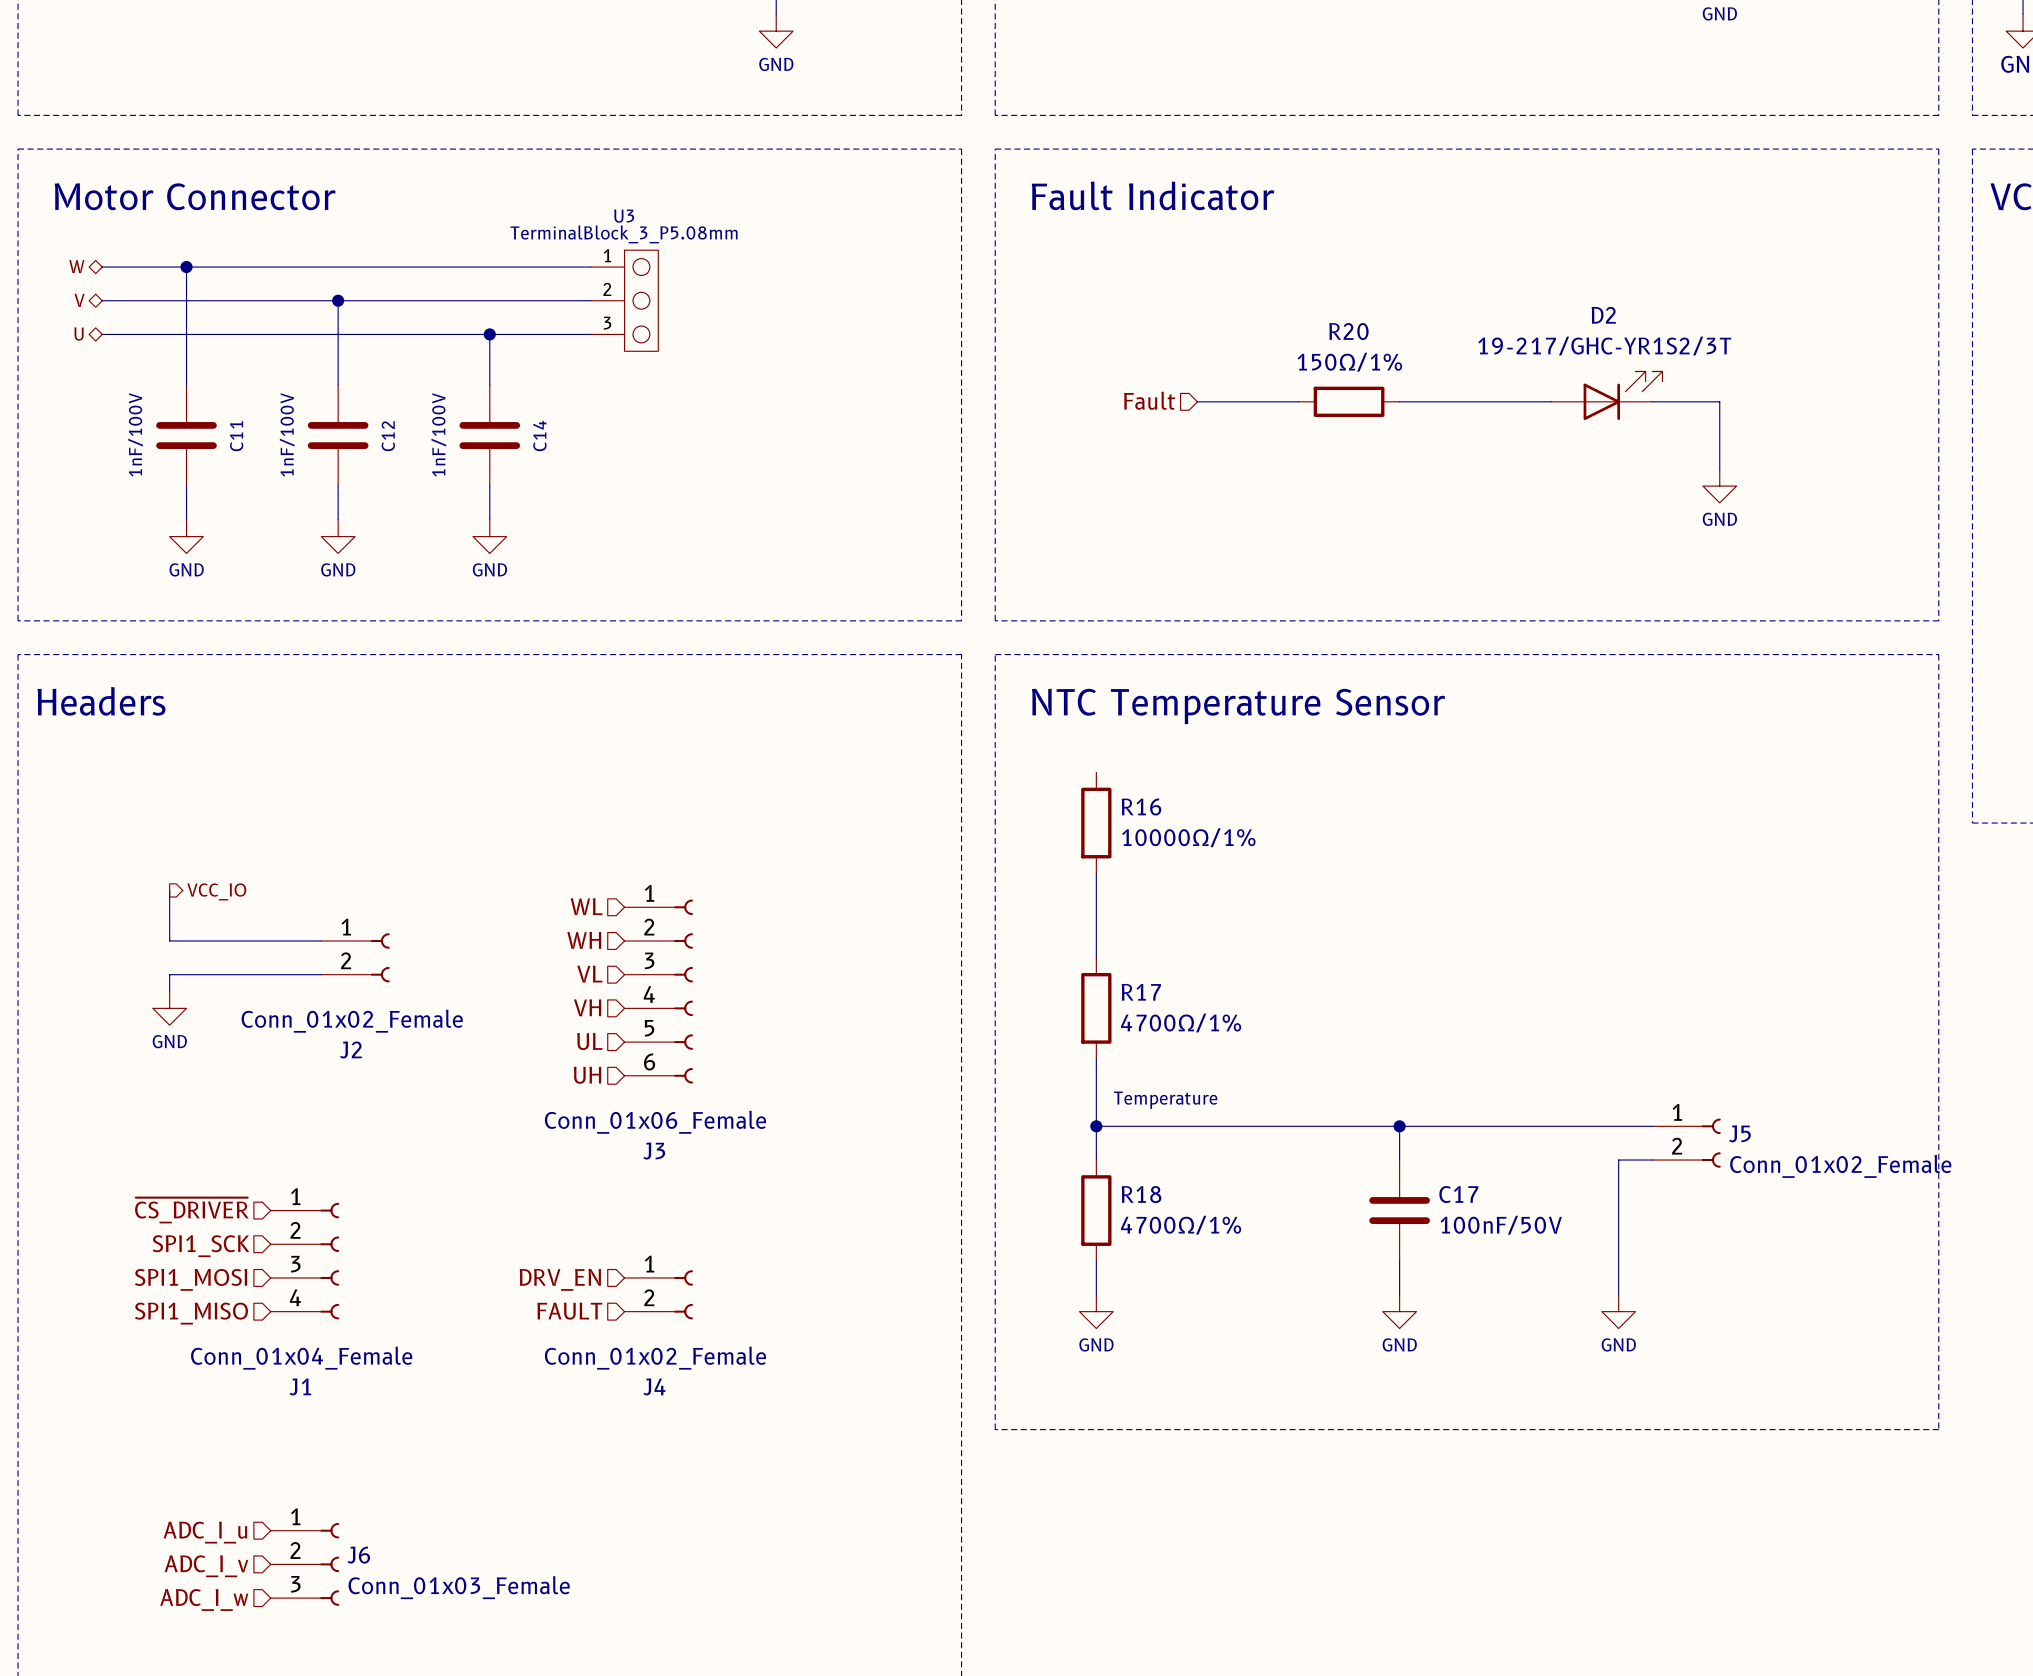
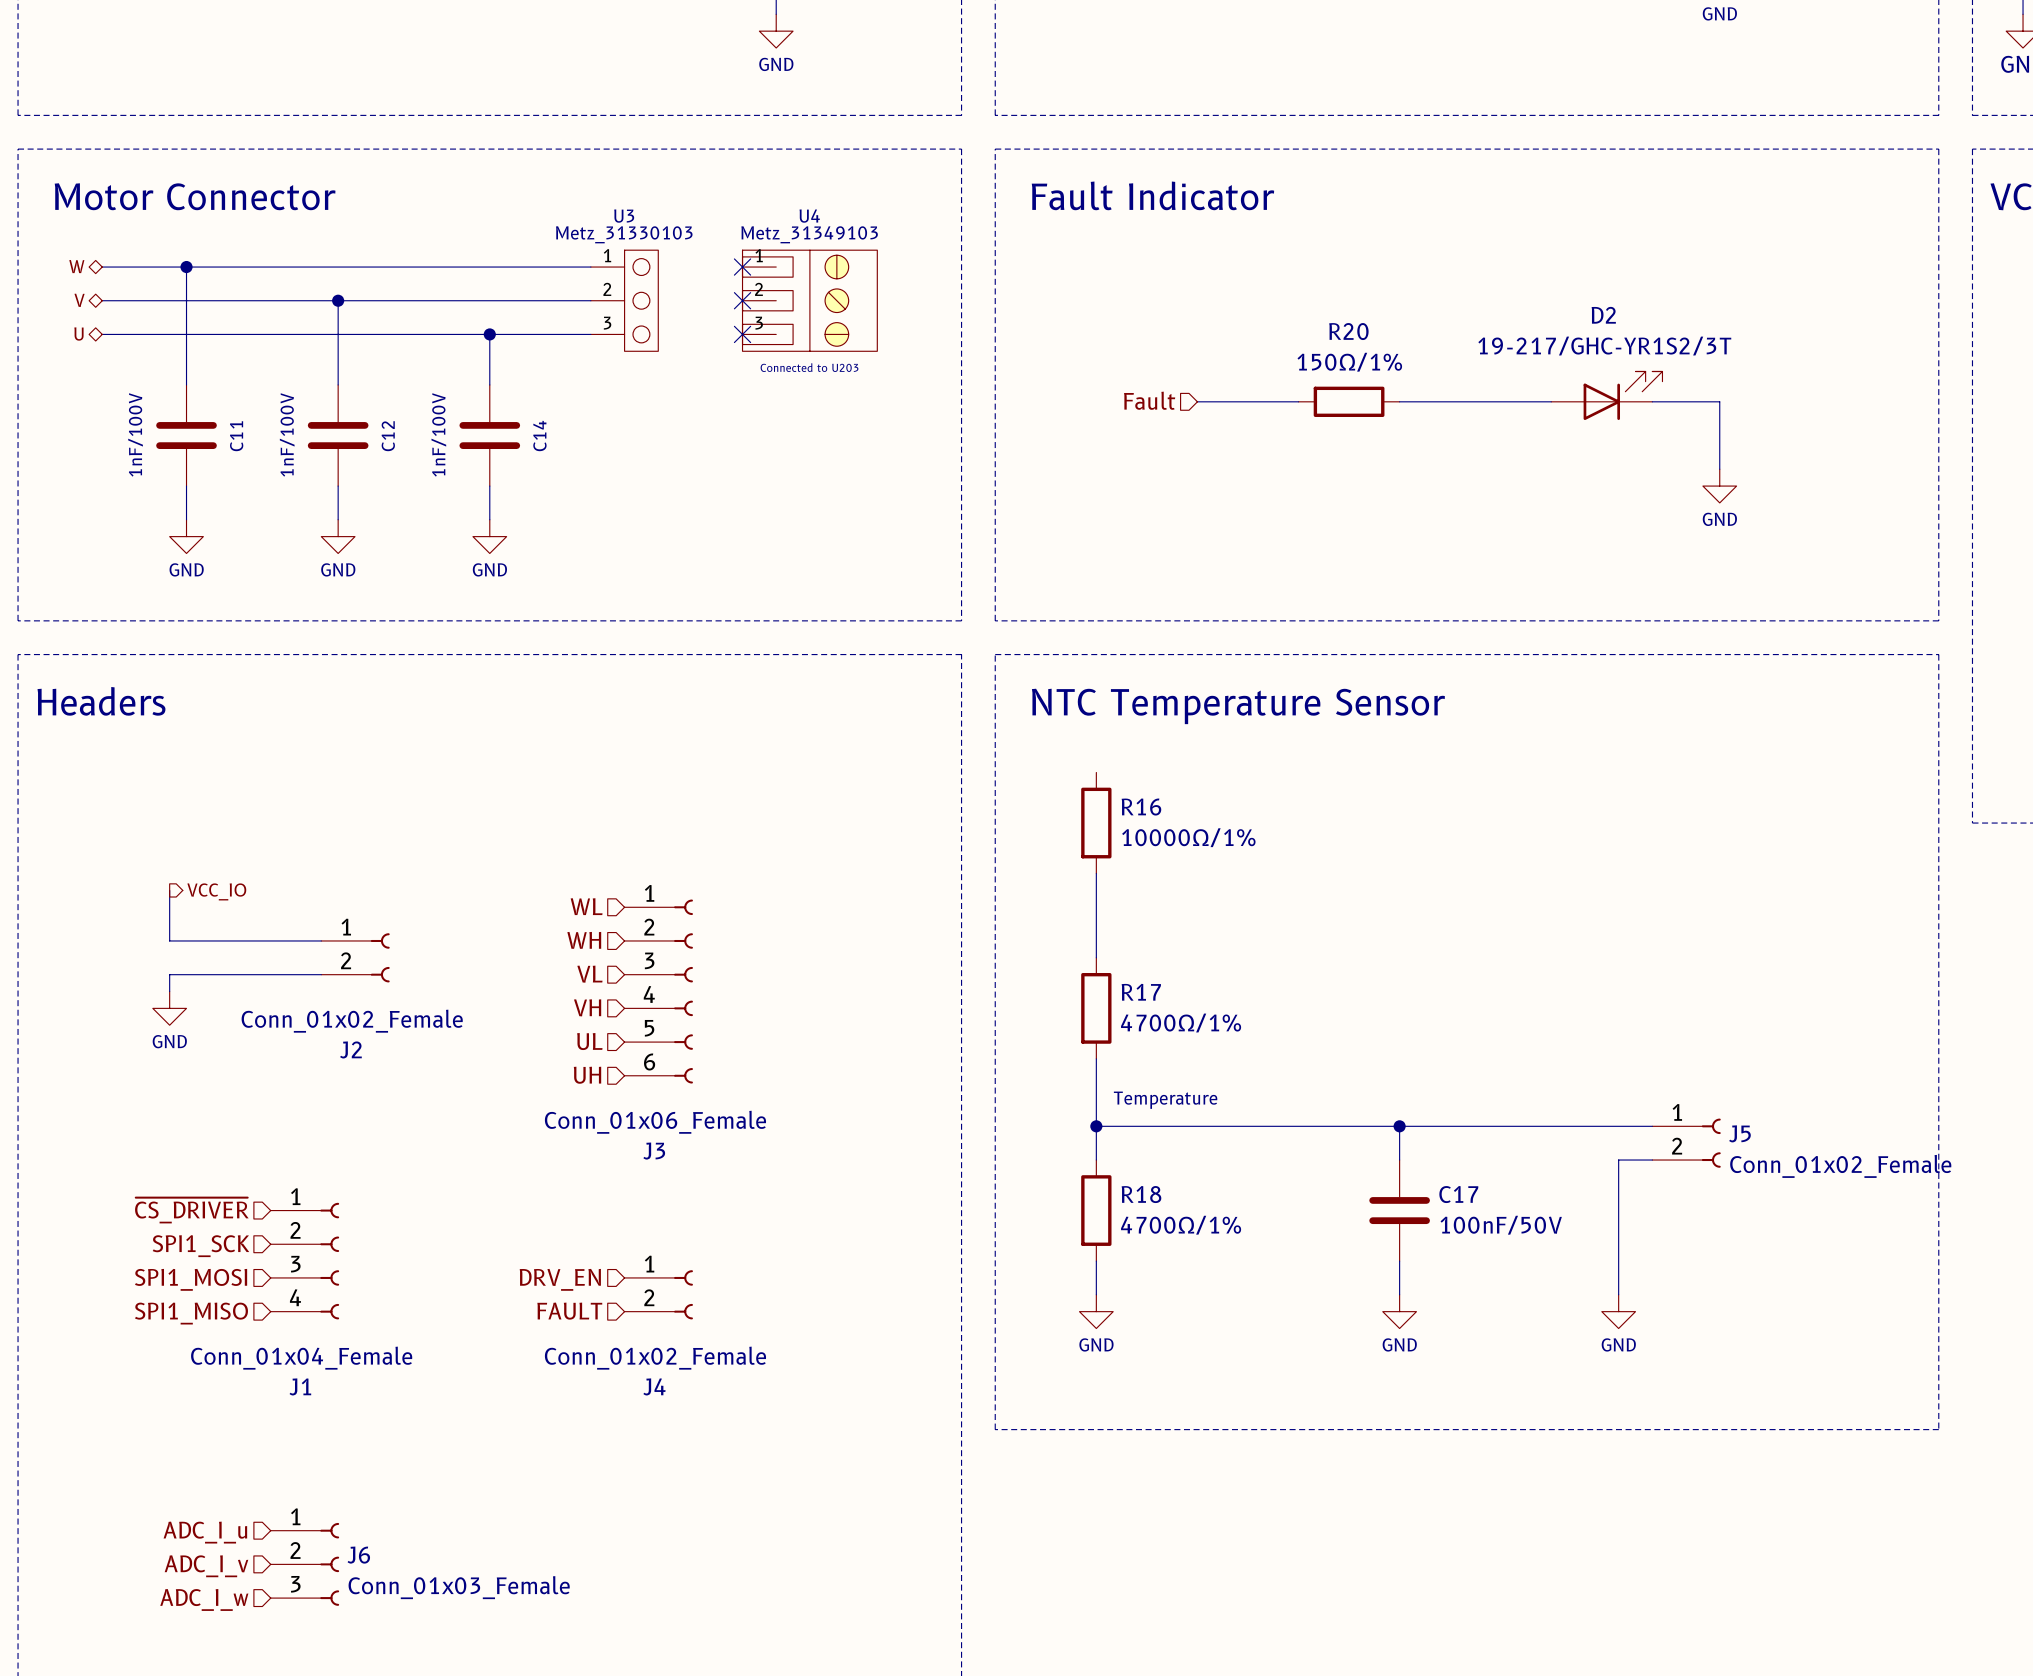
U3 value: TerminalBlock_3_P5.08mm (624, 234) -> Metz_31330103 (624, 234)
no-connect mark: none -> (742, 267)
no-connect mark: none -> (742, 300)
U4: none -> Metz_31349103 (809, 300)
no-connect mark: none -> (742, 334)

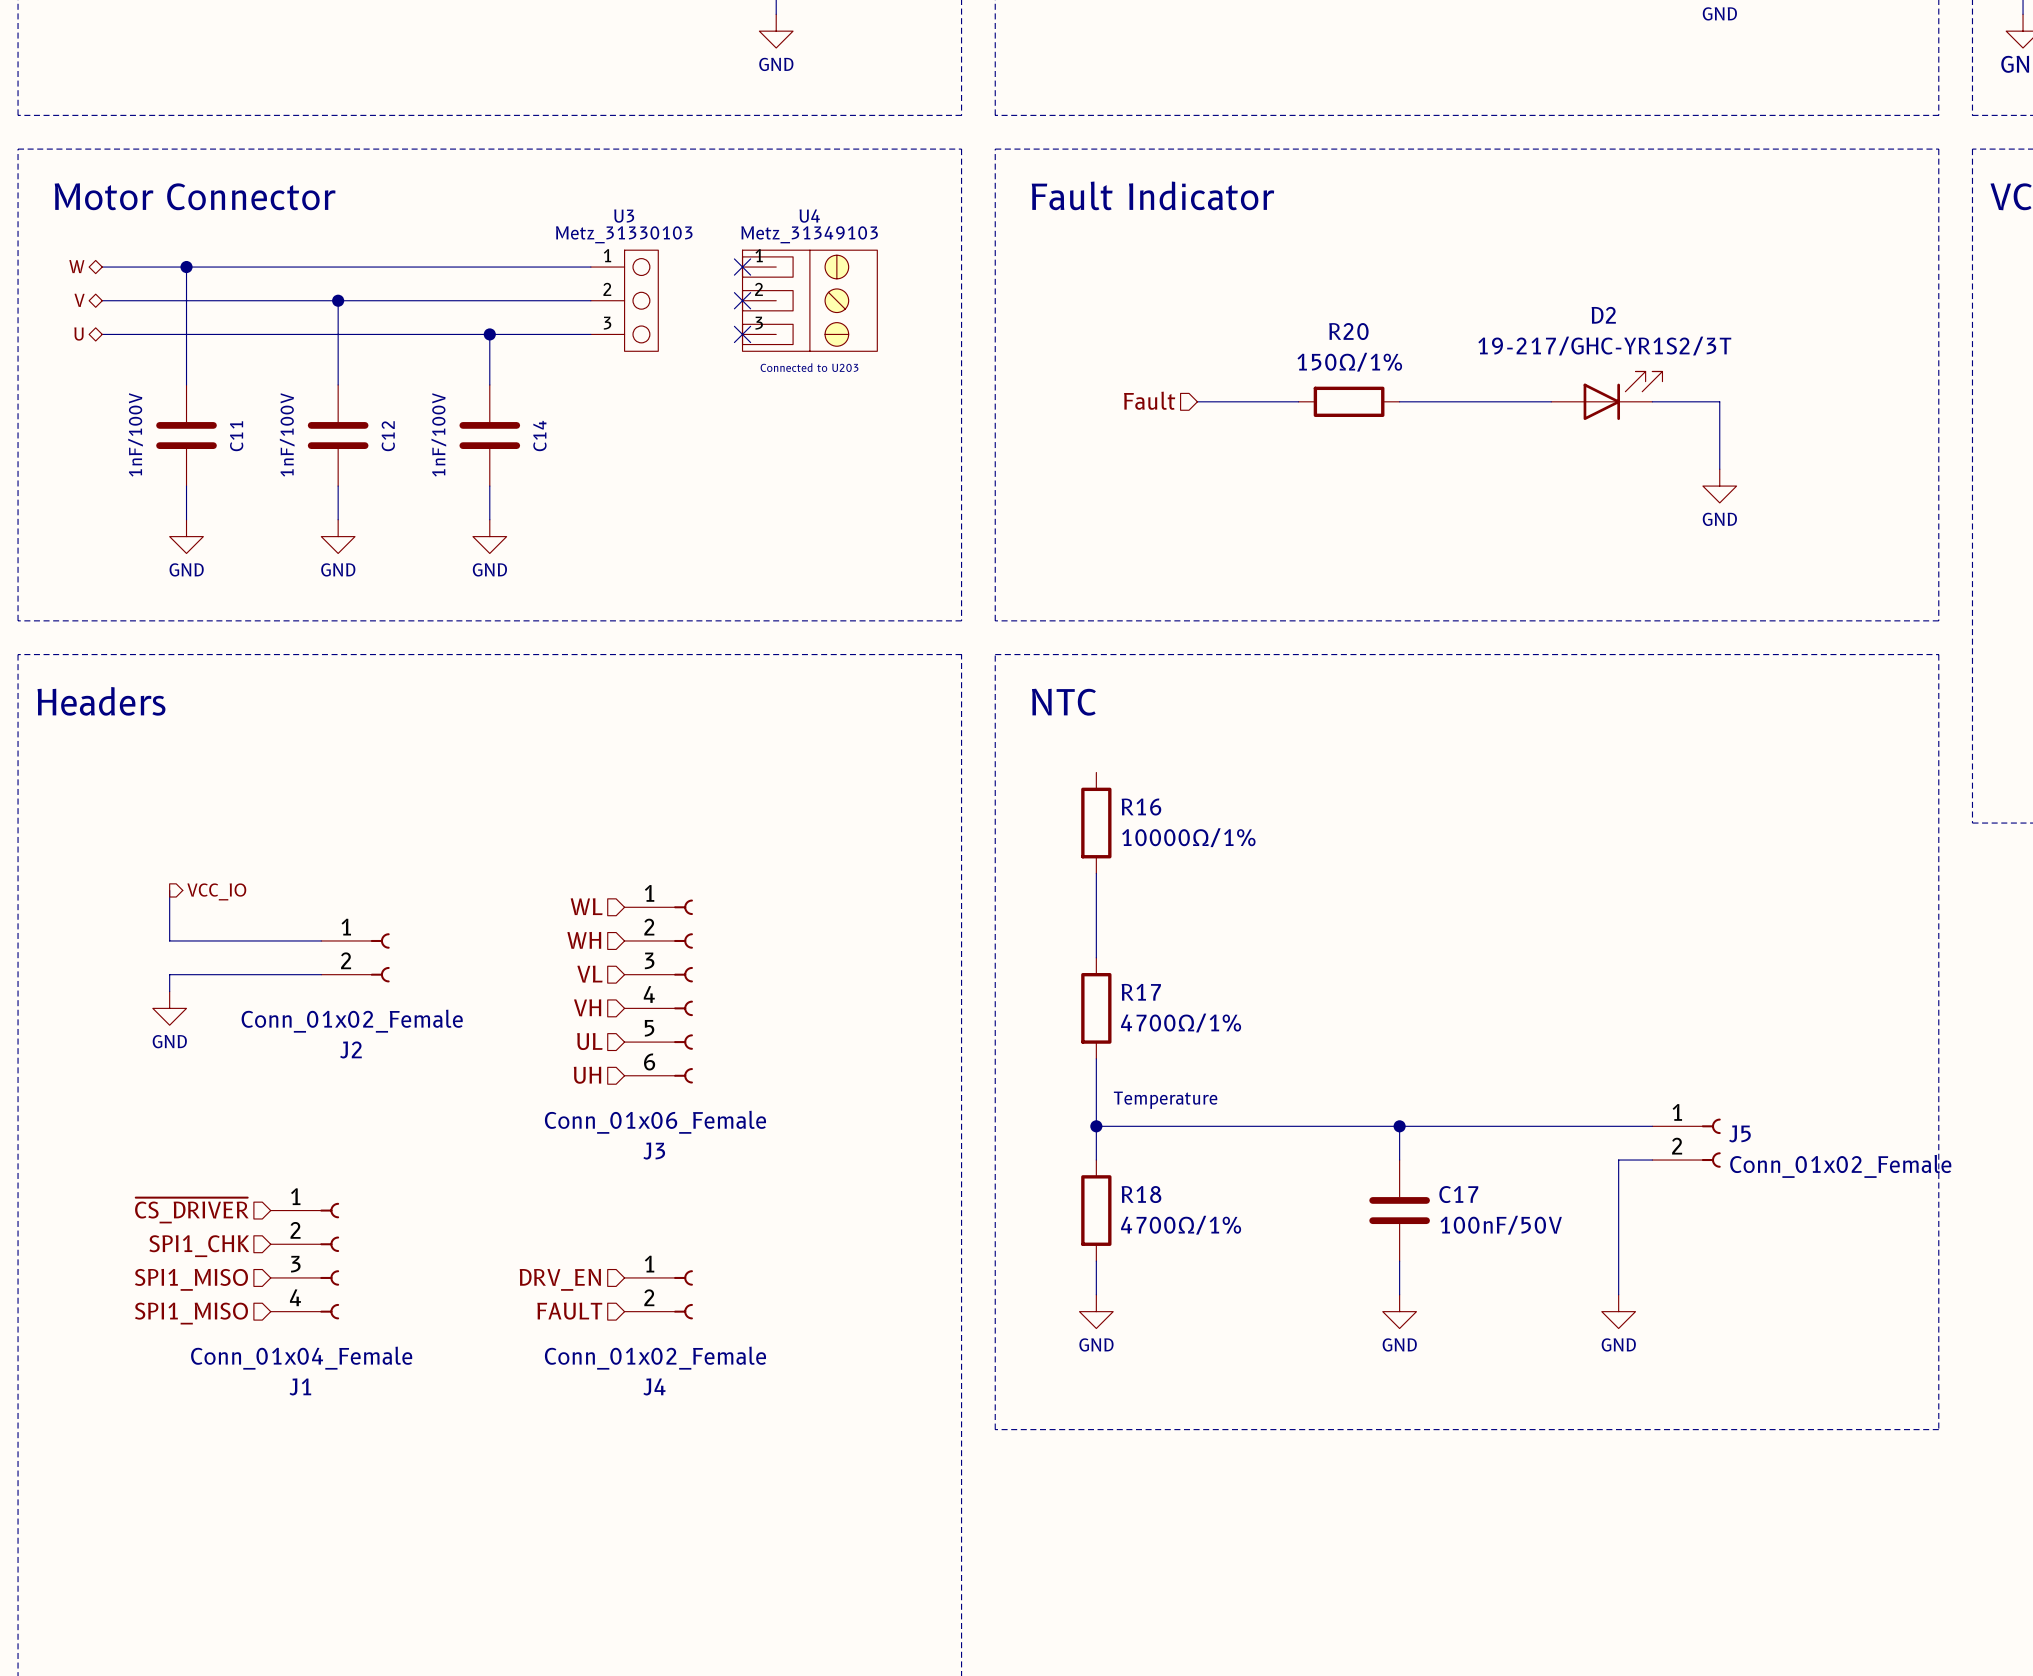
text: NTC Temperature Sensor (1238, 706) -> NTC (1063, 702)
hierarchical label: SPI1_SCK (200, 1246) -> SPI1_CHK (199, 1246)
hierarchical label: SPI1_MOSI (191, 1279) -> SPI1_MISO (191, 1279)
hierarchical label: ADC_I_u (205, 1532) -> none
J6: Conn_01x03_Female (304, 1564) -> none
hierarchical label: ADC_I_v (206, 1566) -> none
hierarchical label: ADC_I_w (204, 1599) -> none

